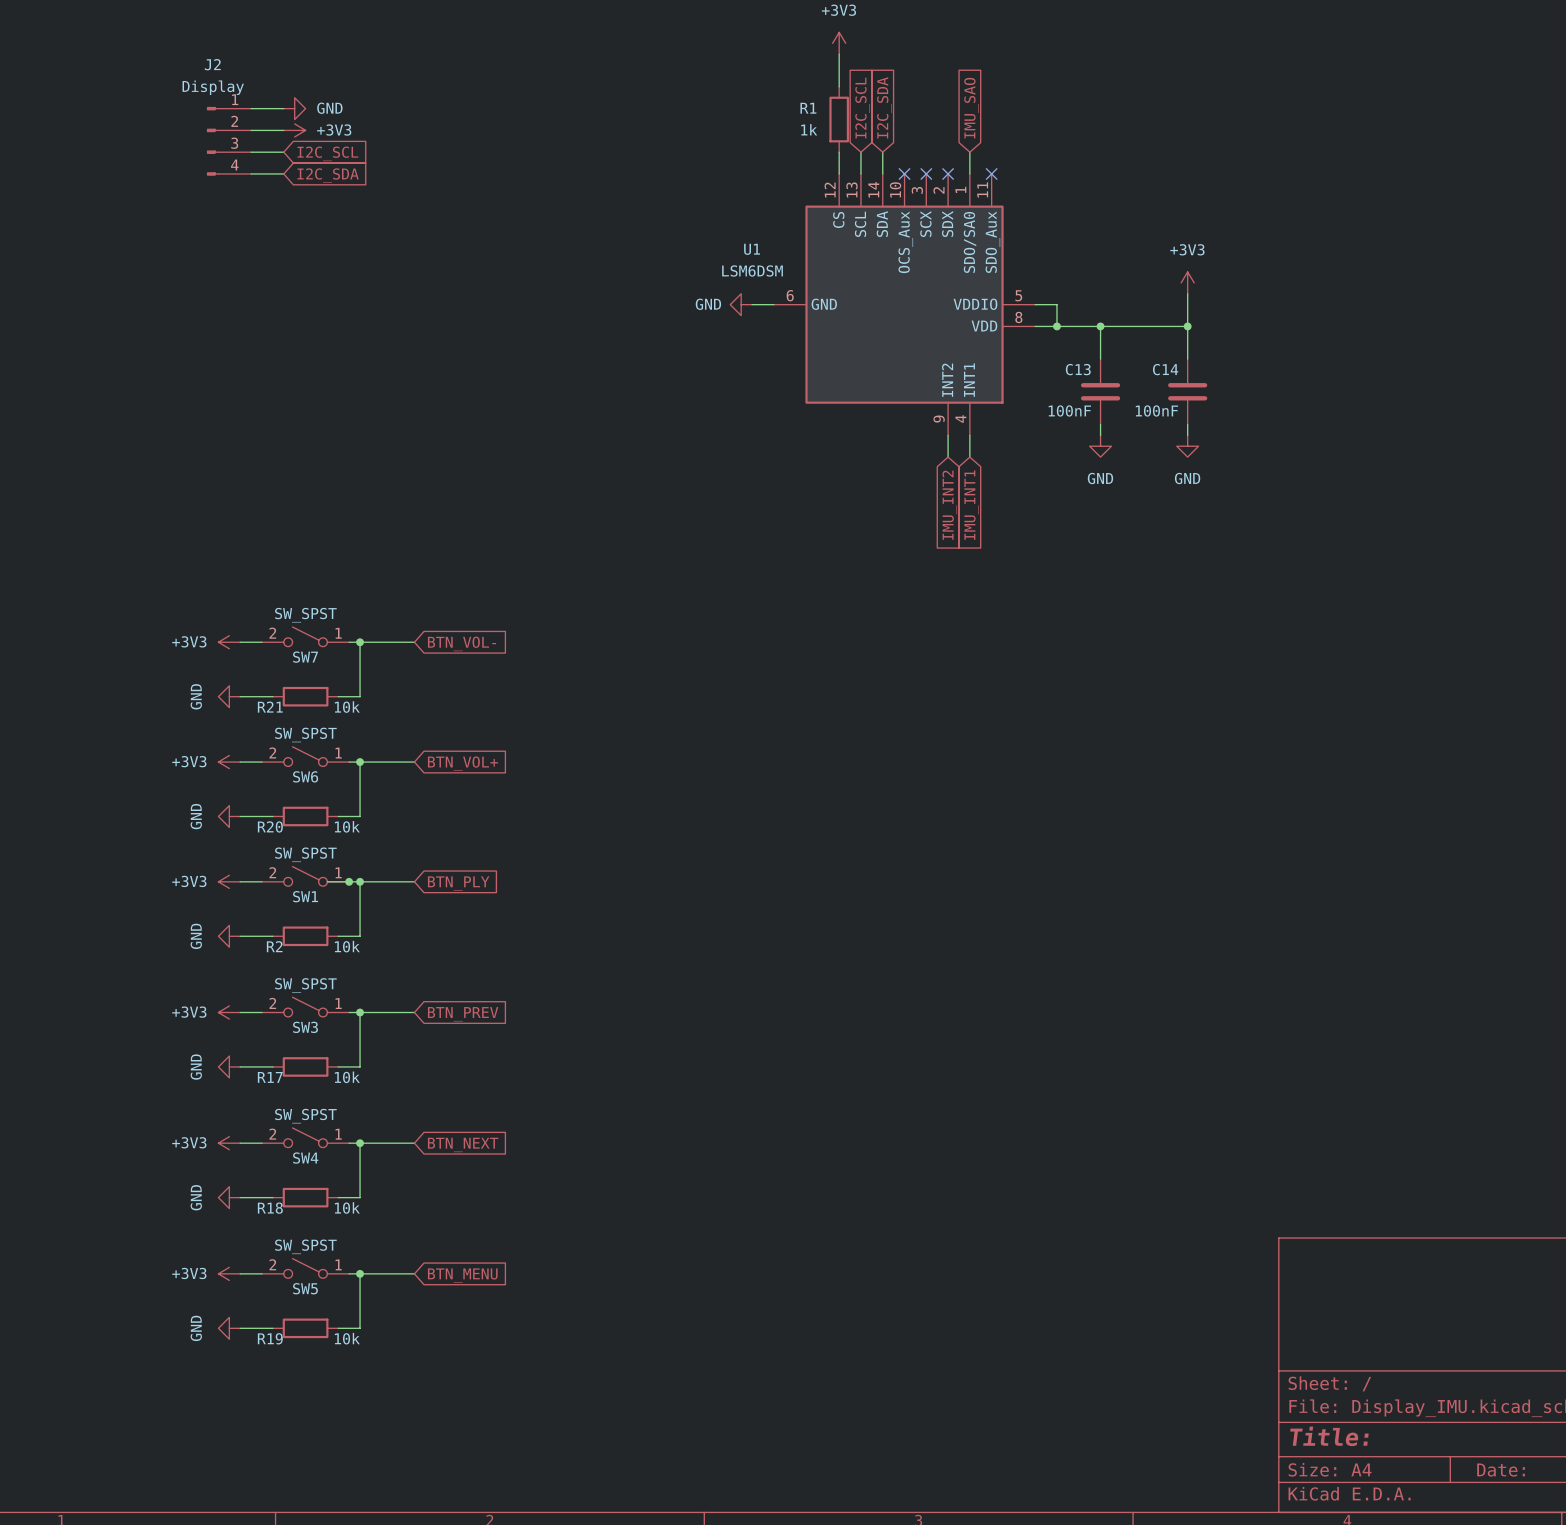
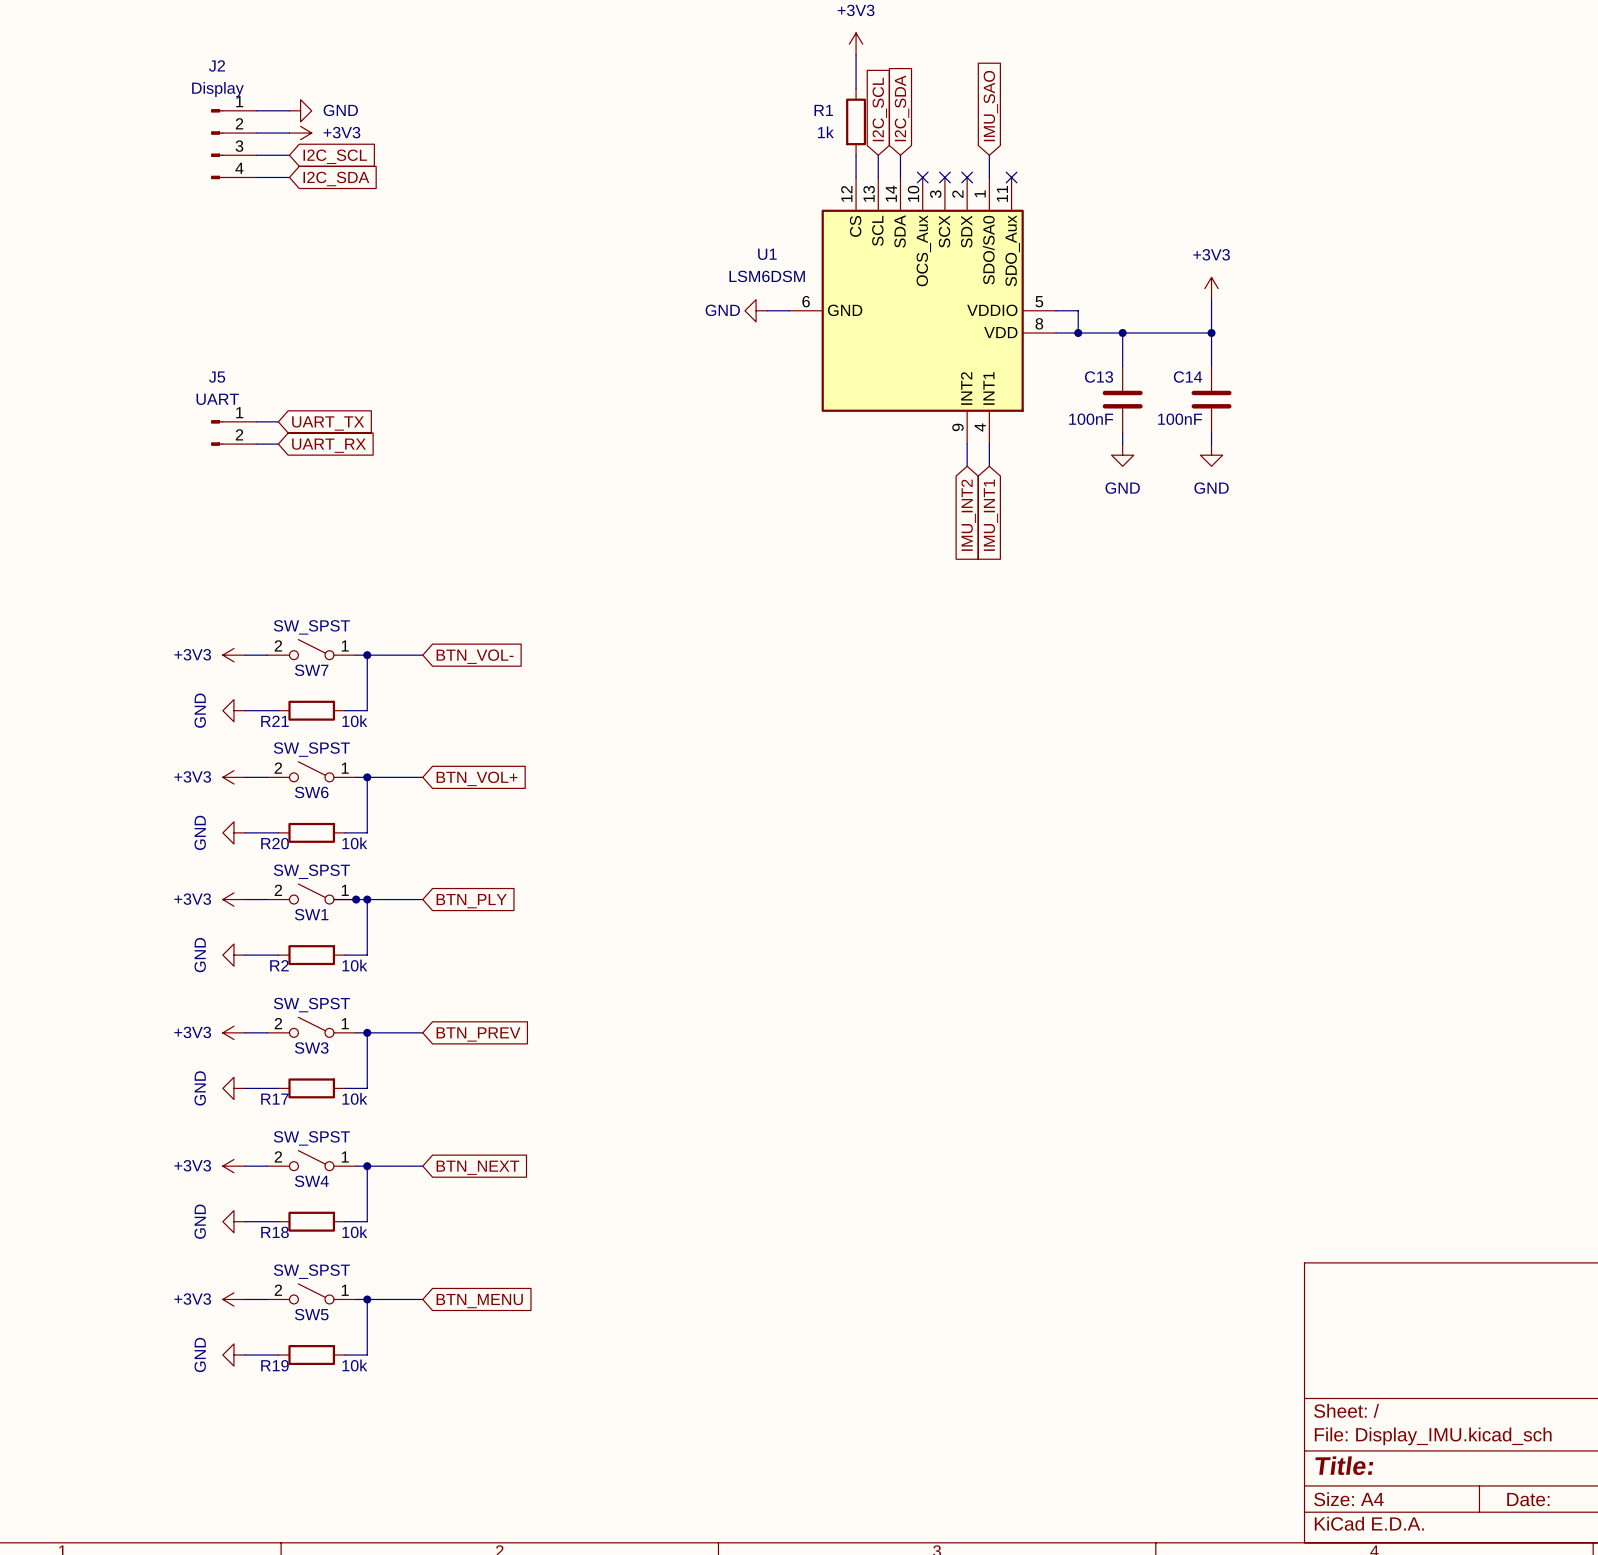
wire: none -> (256, 421) (278, 421)
global label: none -> UART_TX (328, 423)
J5: none -> UART (233, 432)
wire: none -> (256, 444) (278, 444)
global label: none -> UART_RX (329, 445)

